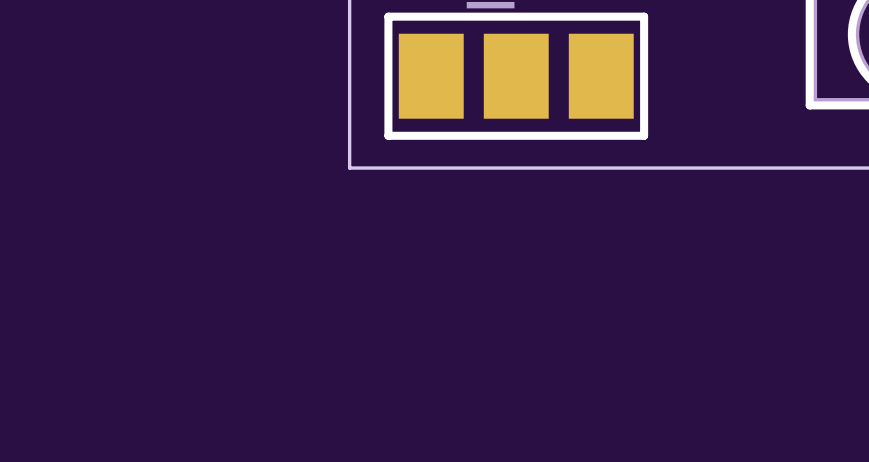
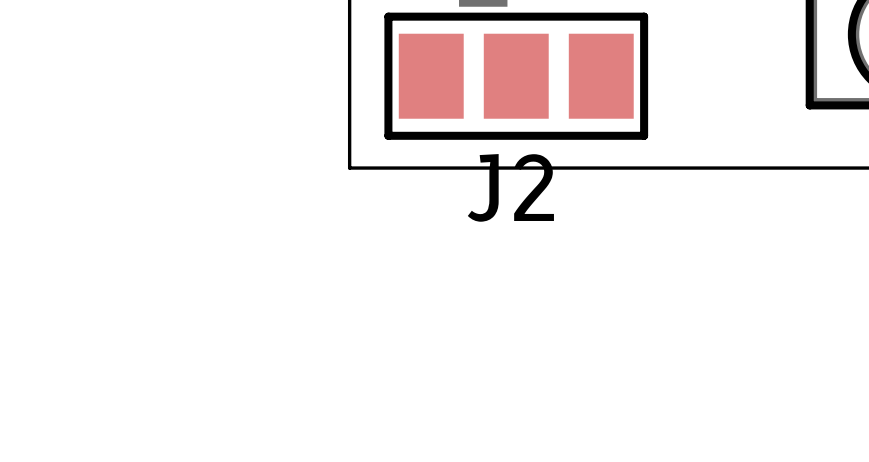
J2 name: none -> J2 (510, 187)

